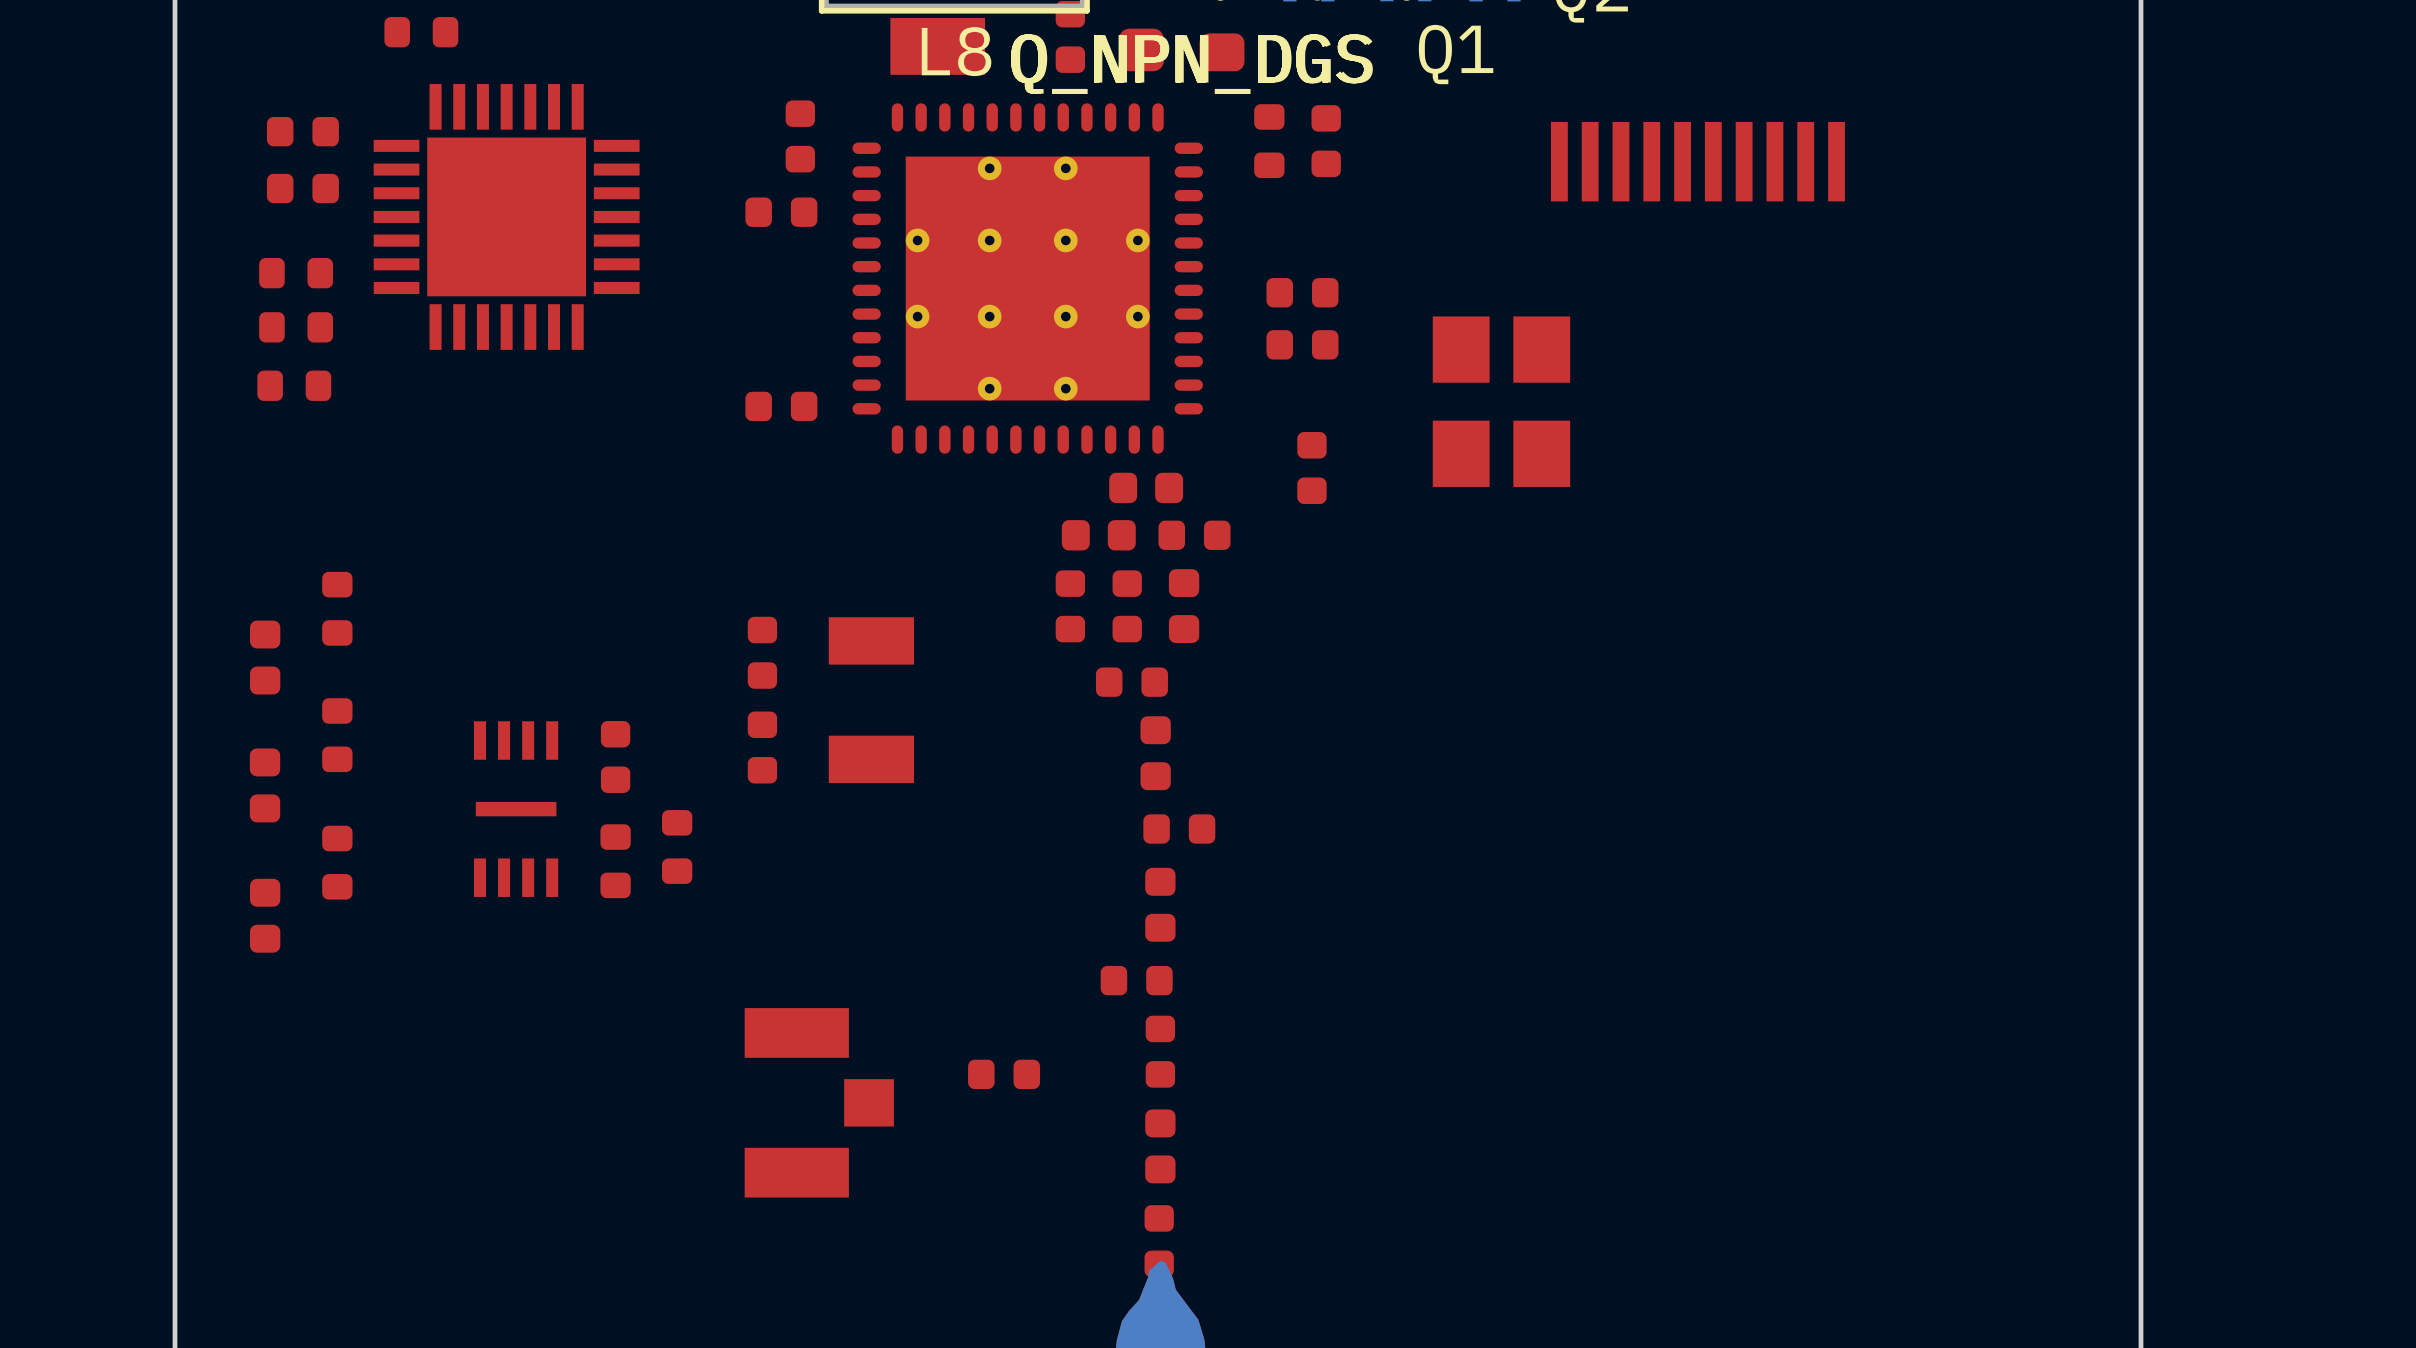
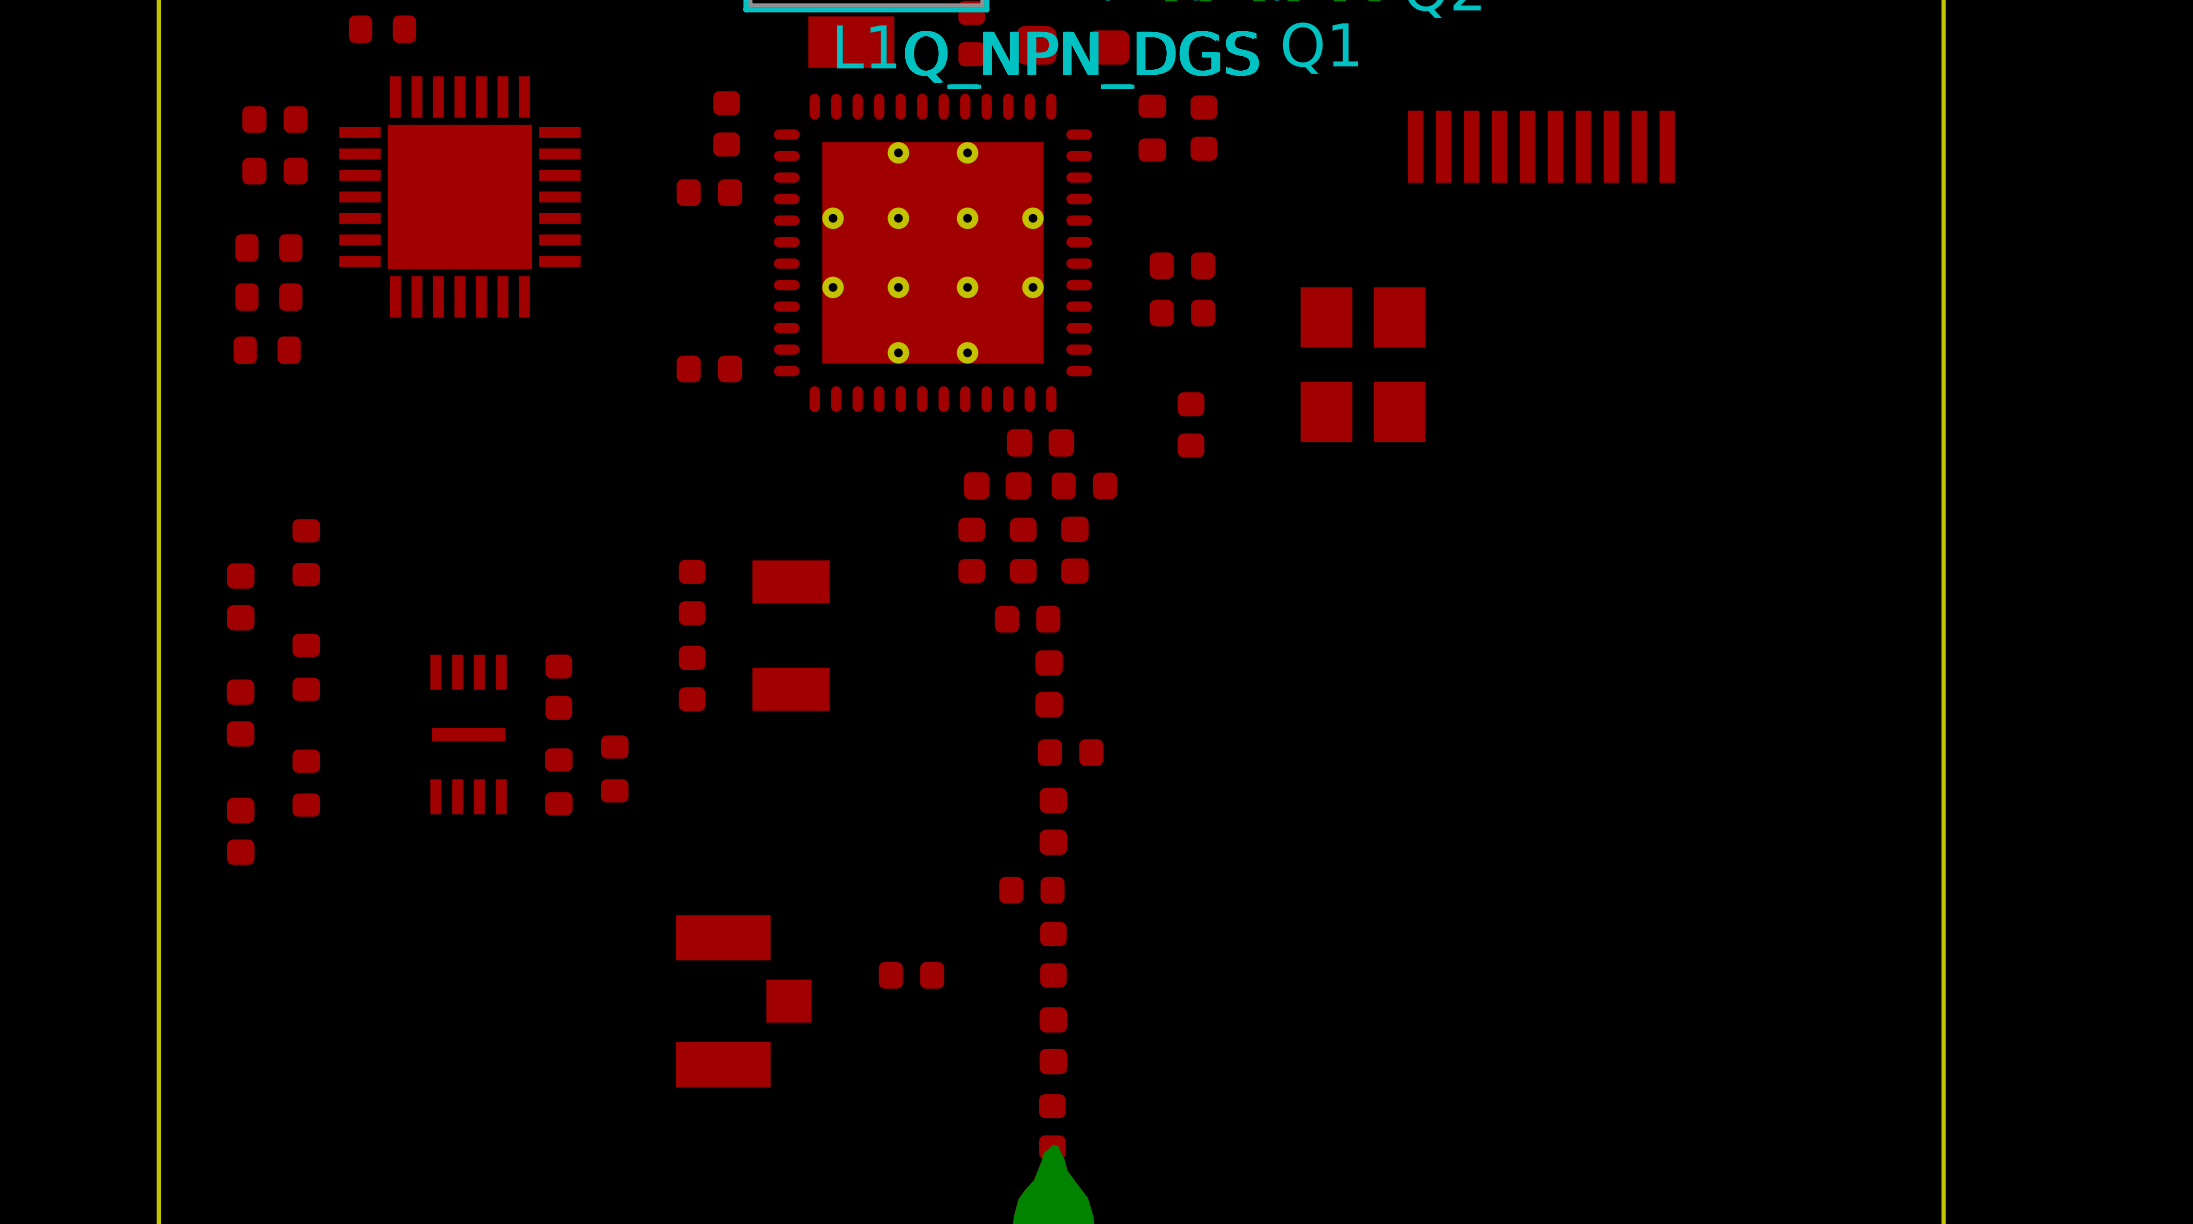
L8 name: L8 (956, 51) -> L1 (866, 46)

